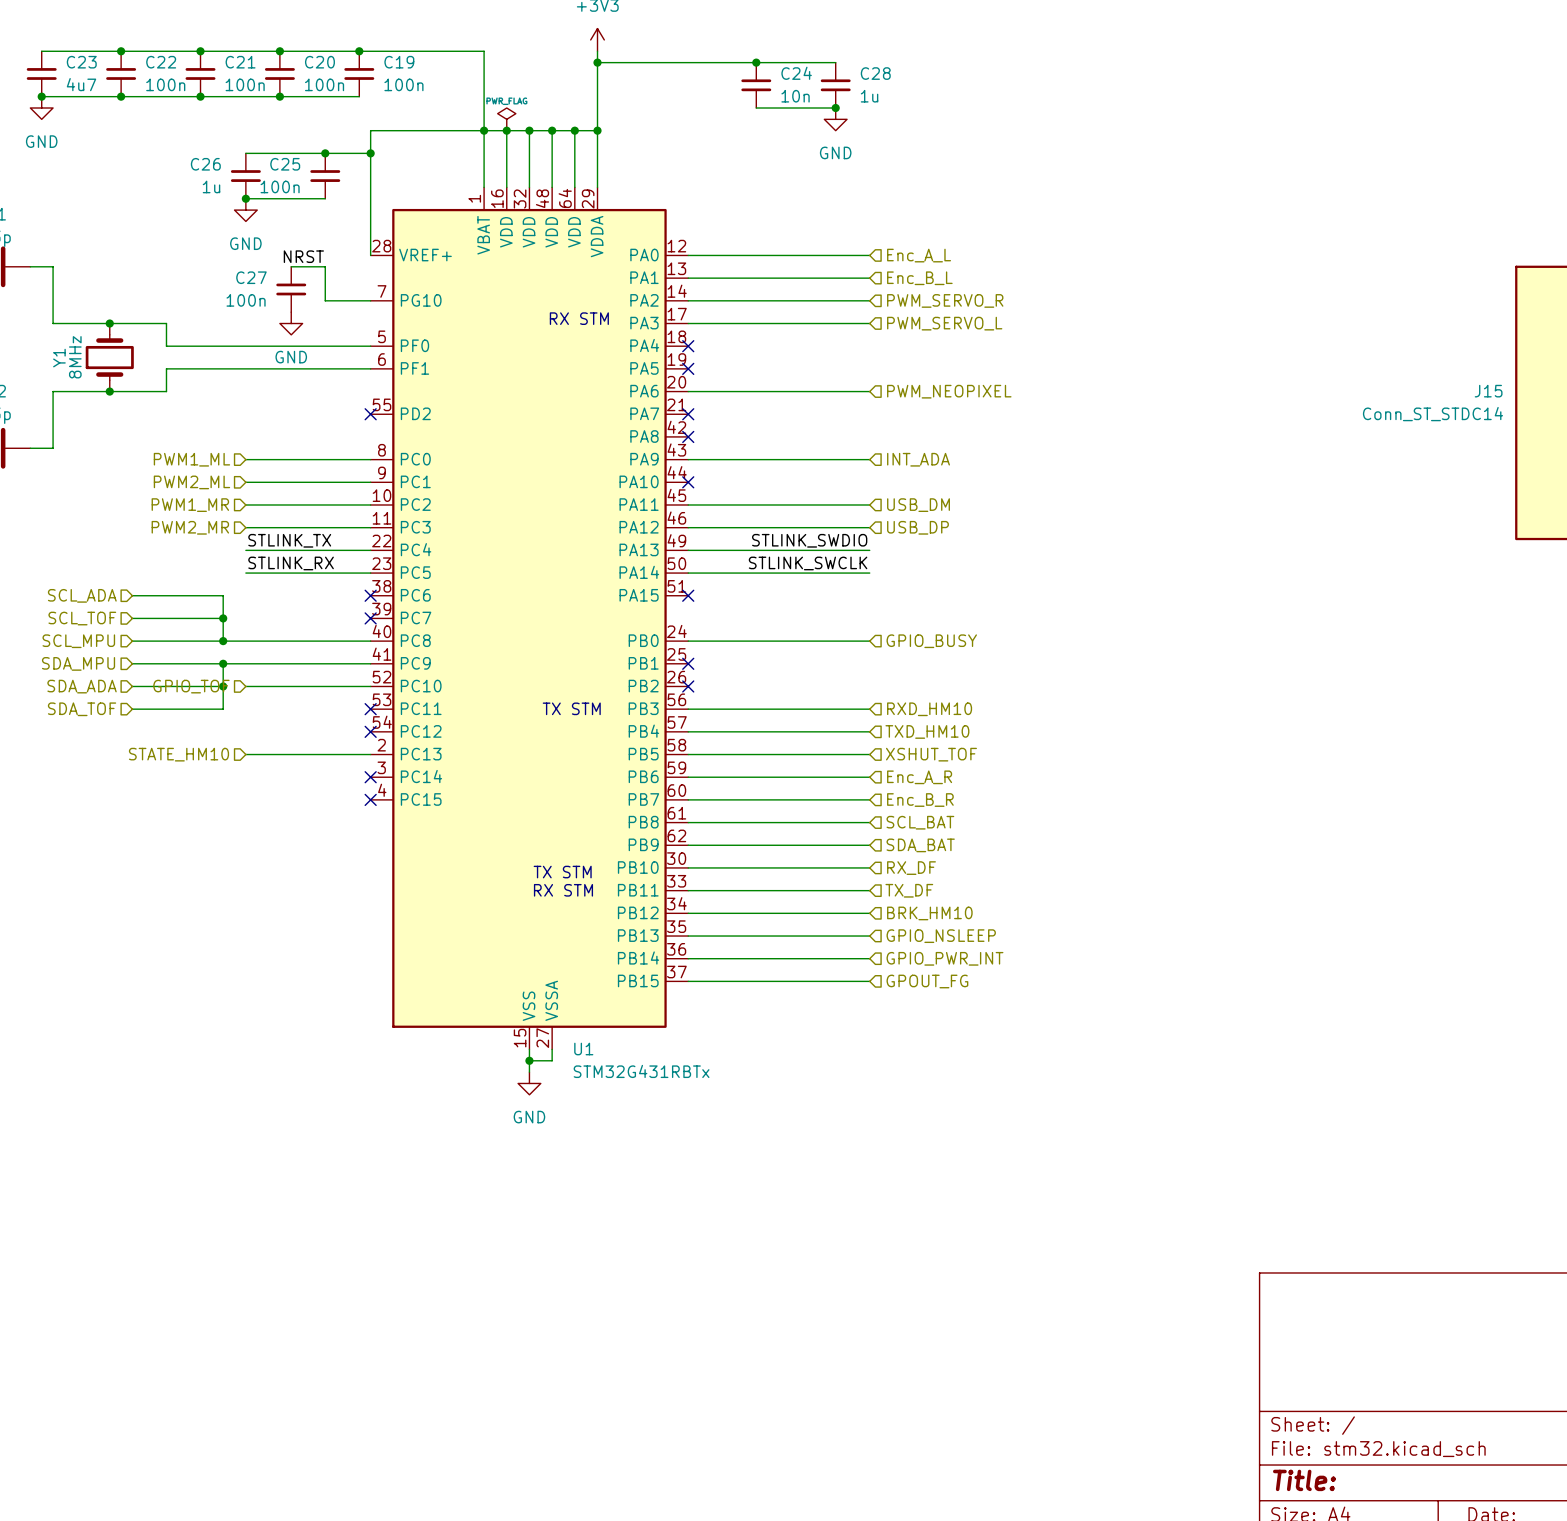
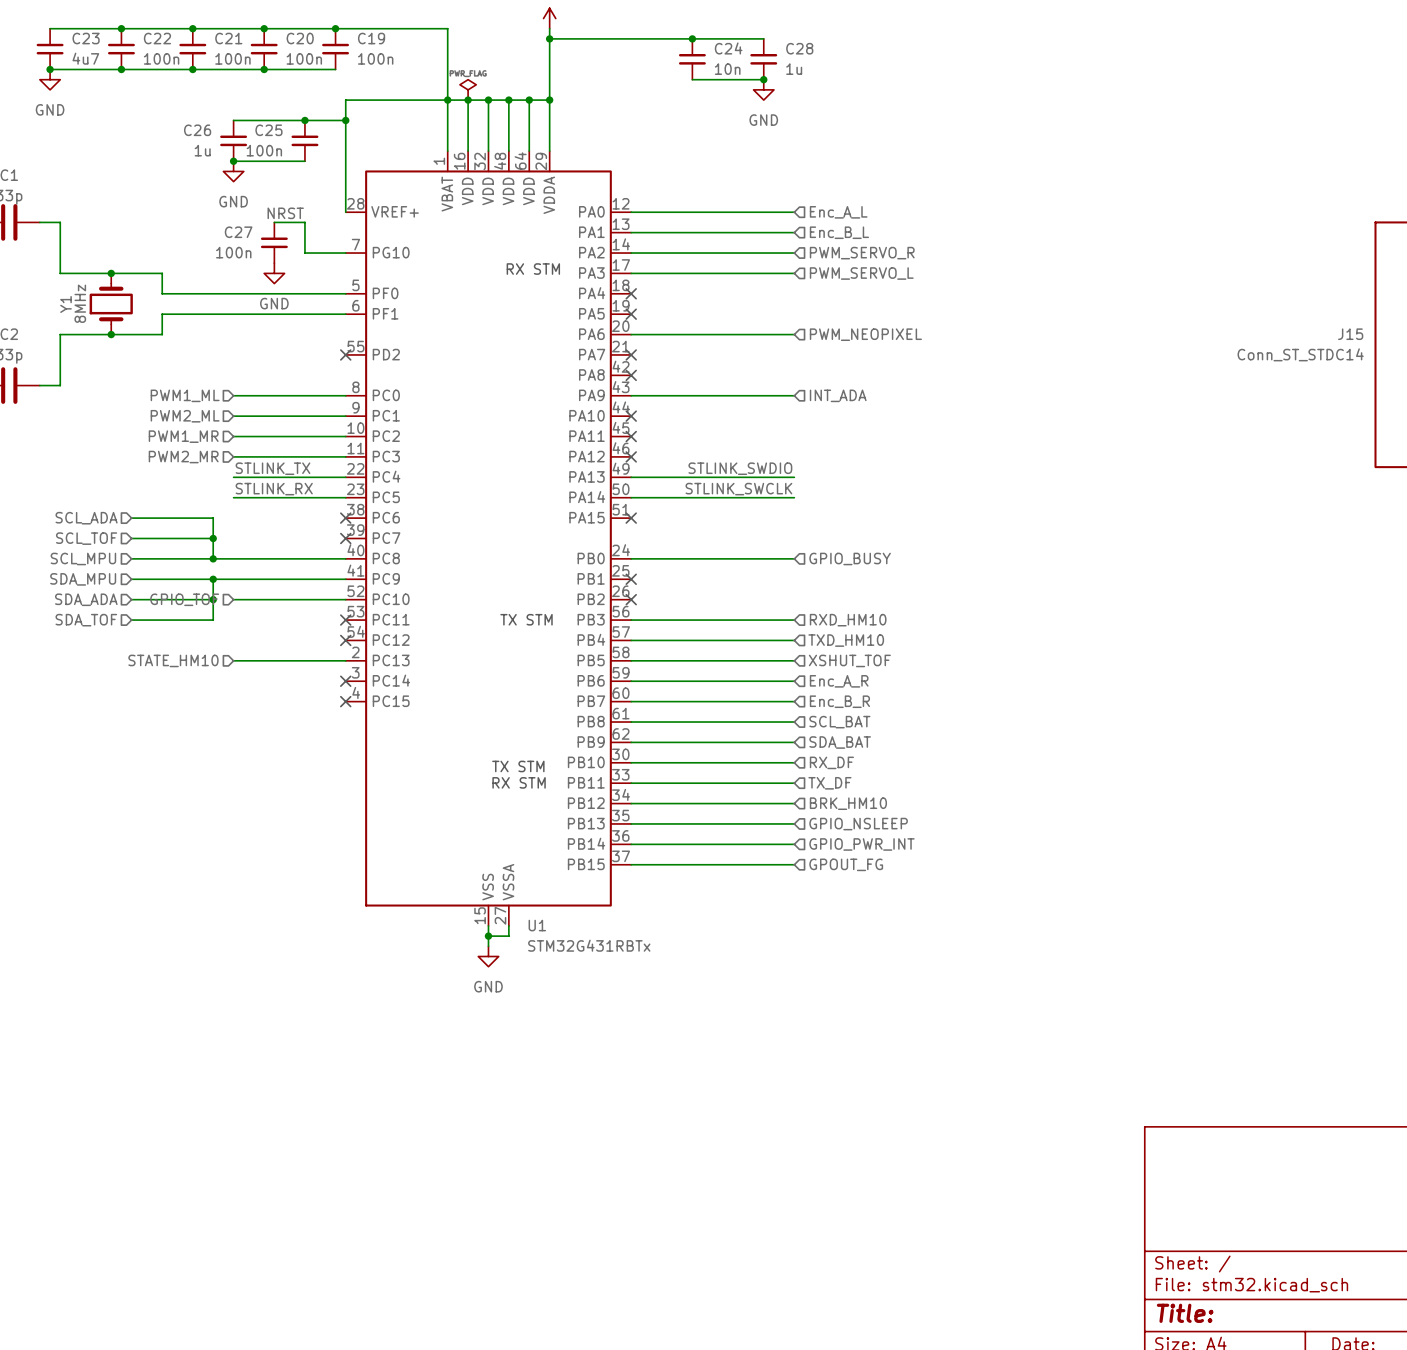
wire: (688, 504) (869, 504) -> none
no-connect mark: none -> (631, 436)
hierarchical label: USB_DM (918, 505) -> none
wire: (688, 527) (869, 527) -> none
no-connect mark: none -> (631, 456)
hierarchical label: USB_DP (917, 527) -> none

